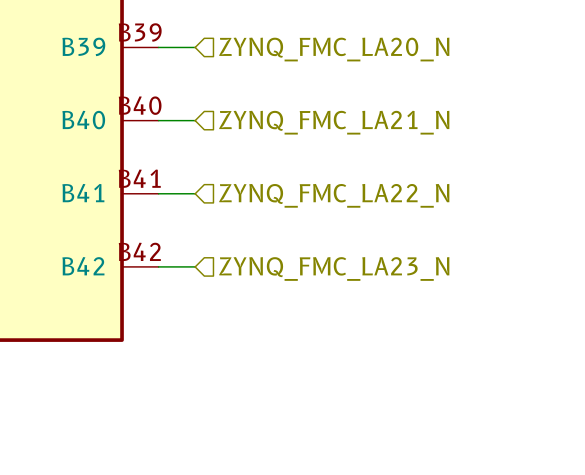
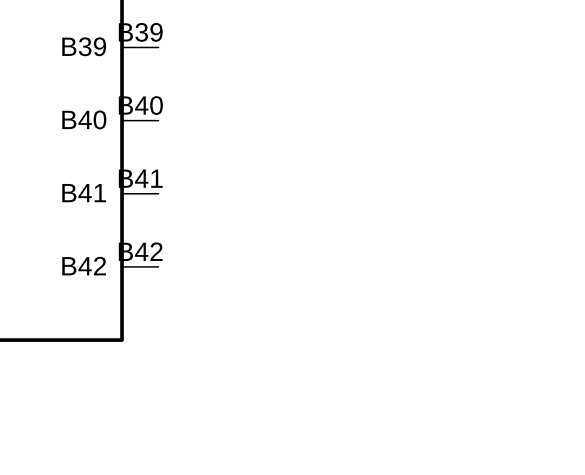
wire: (158, 47) (195, 47) -> none
hierarchical label: ZYNQ_FMC_LA20_N (334, 49) -> none
wire: (158, 120) (195, 120) -> none
hierarchical label: ZYNQ_FMC_LA21_N (334, 122) -> none
wire: (158, 193) (195, 193) -> none
hierarchical label: ZYNQ_FMC_LA22_N (334, 195) -> none
wire: (158, 266) (195, 266) -> none
hierarchical label: ZYNQ_FMC_LA23_N (334, 268) -> none

